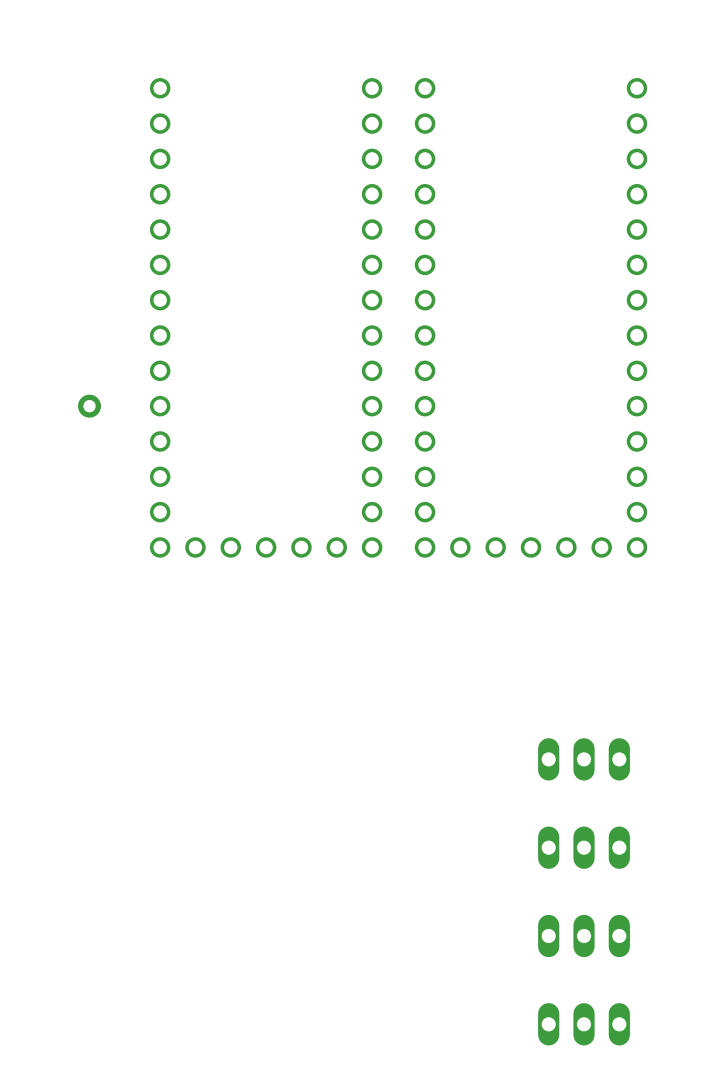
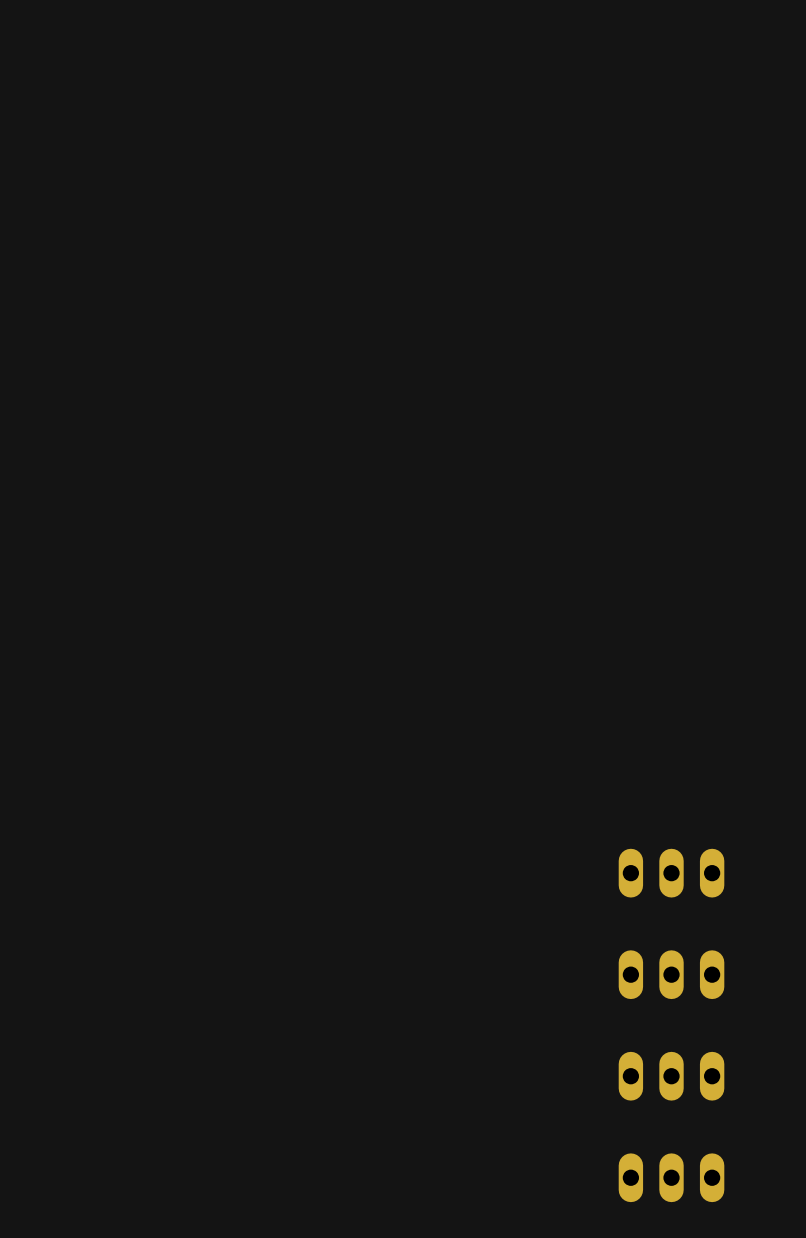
part: (266, 317) -> none
part: (531, 317) -> none
part: (89, 406) -> none

